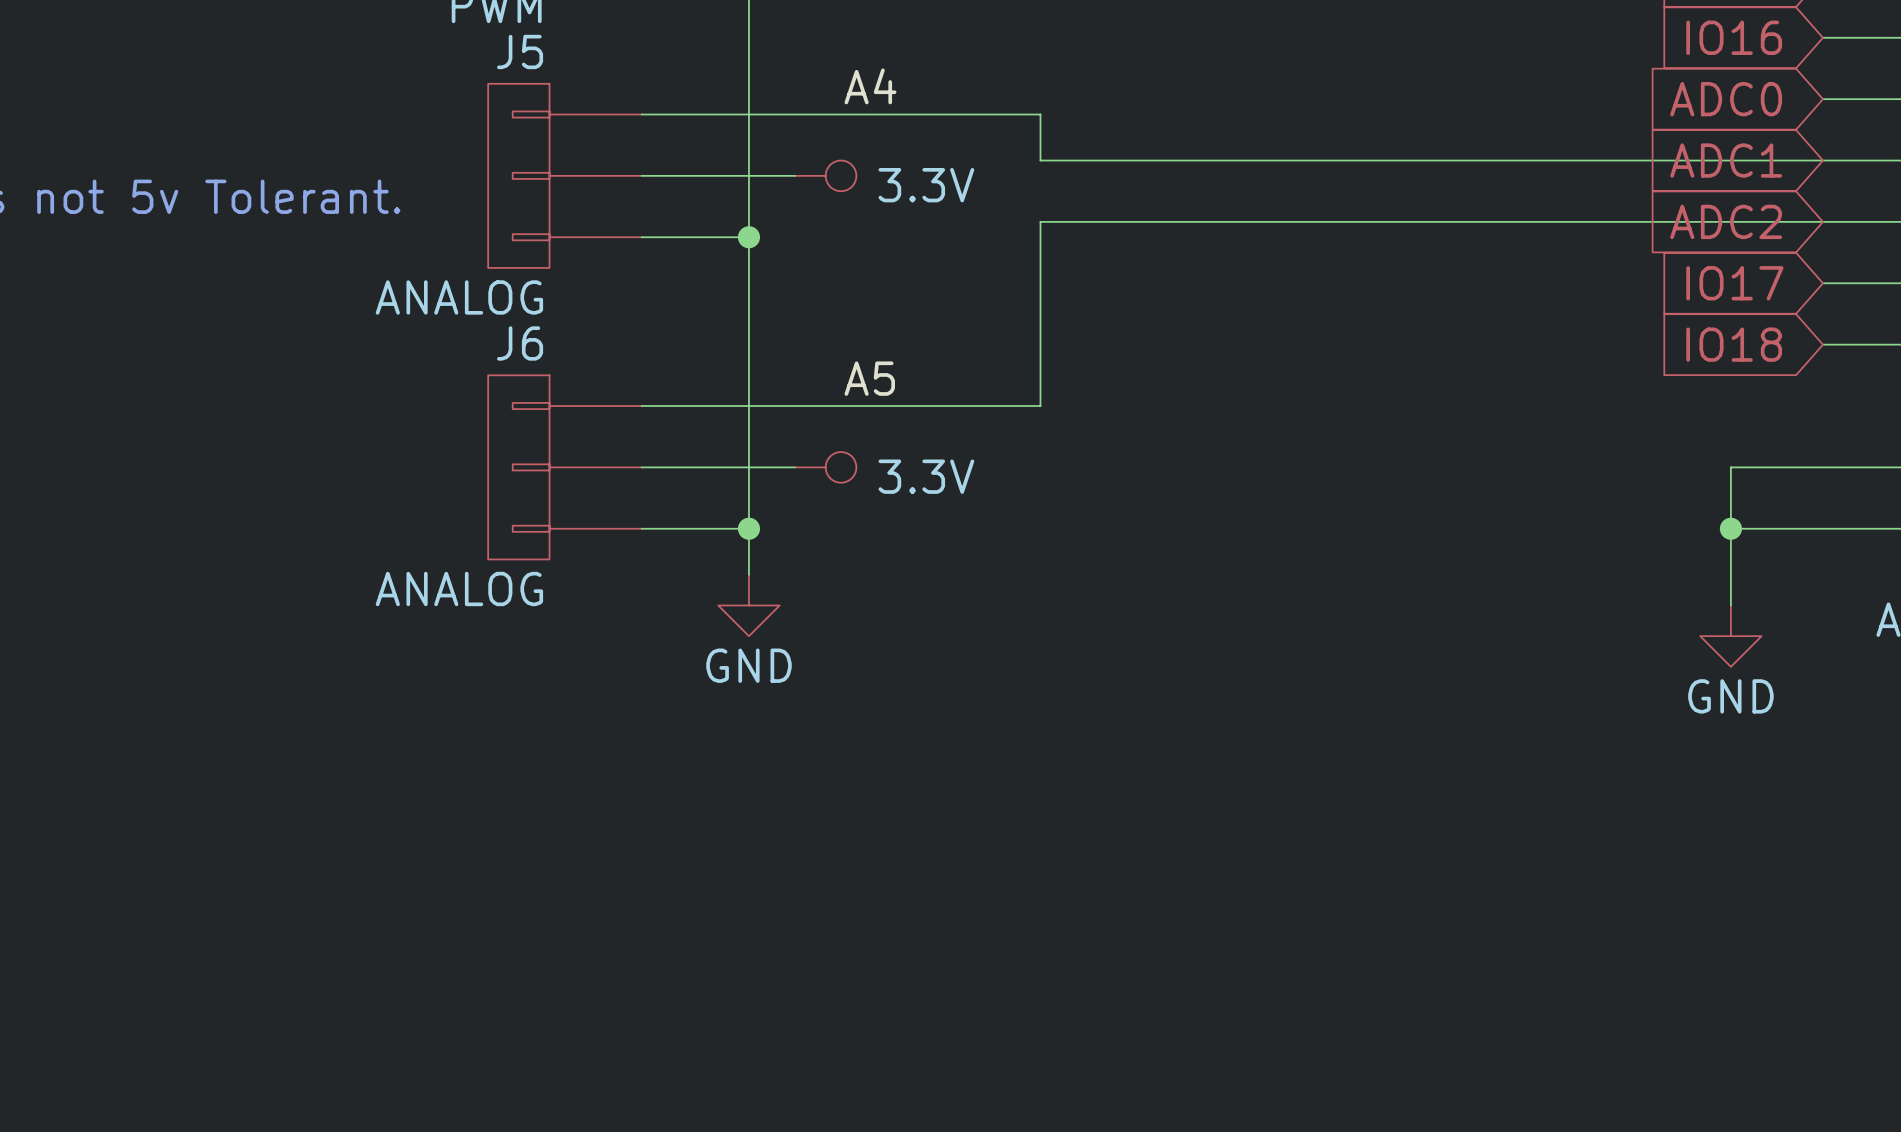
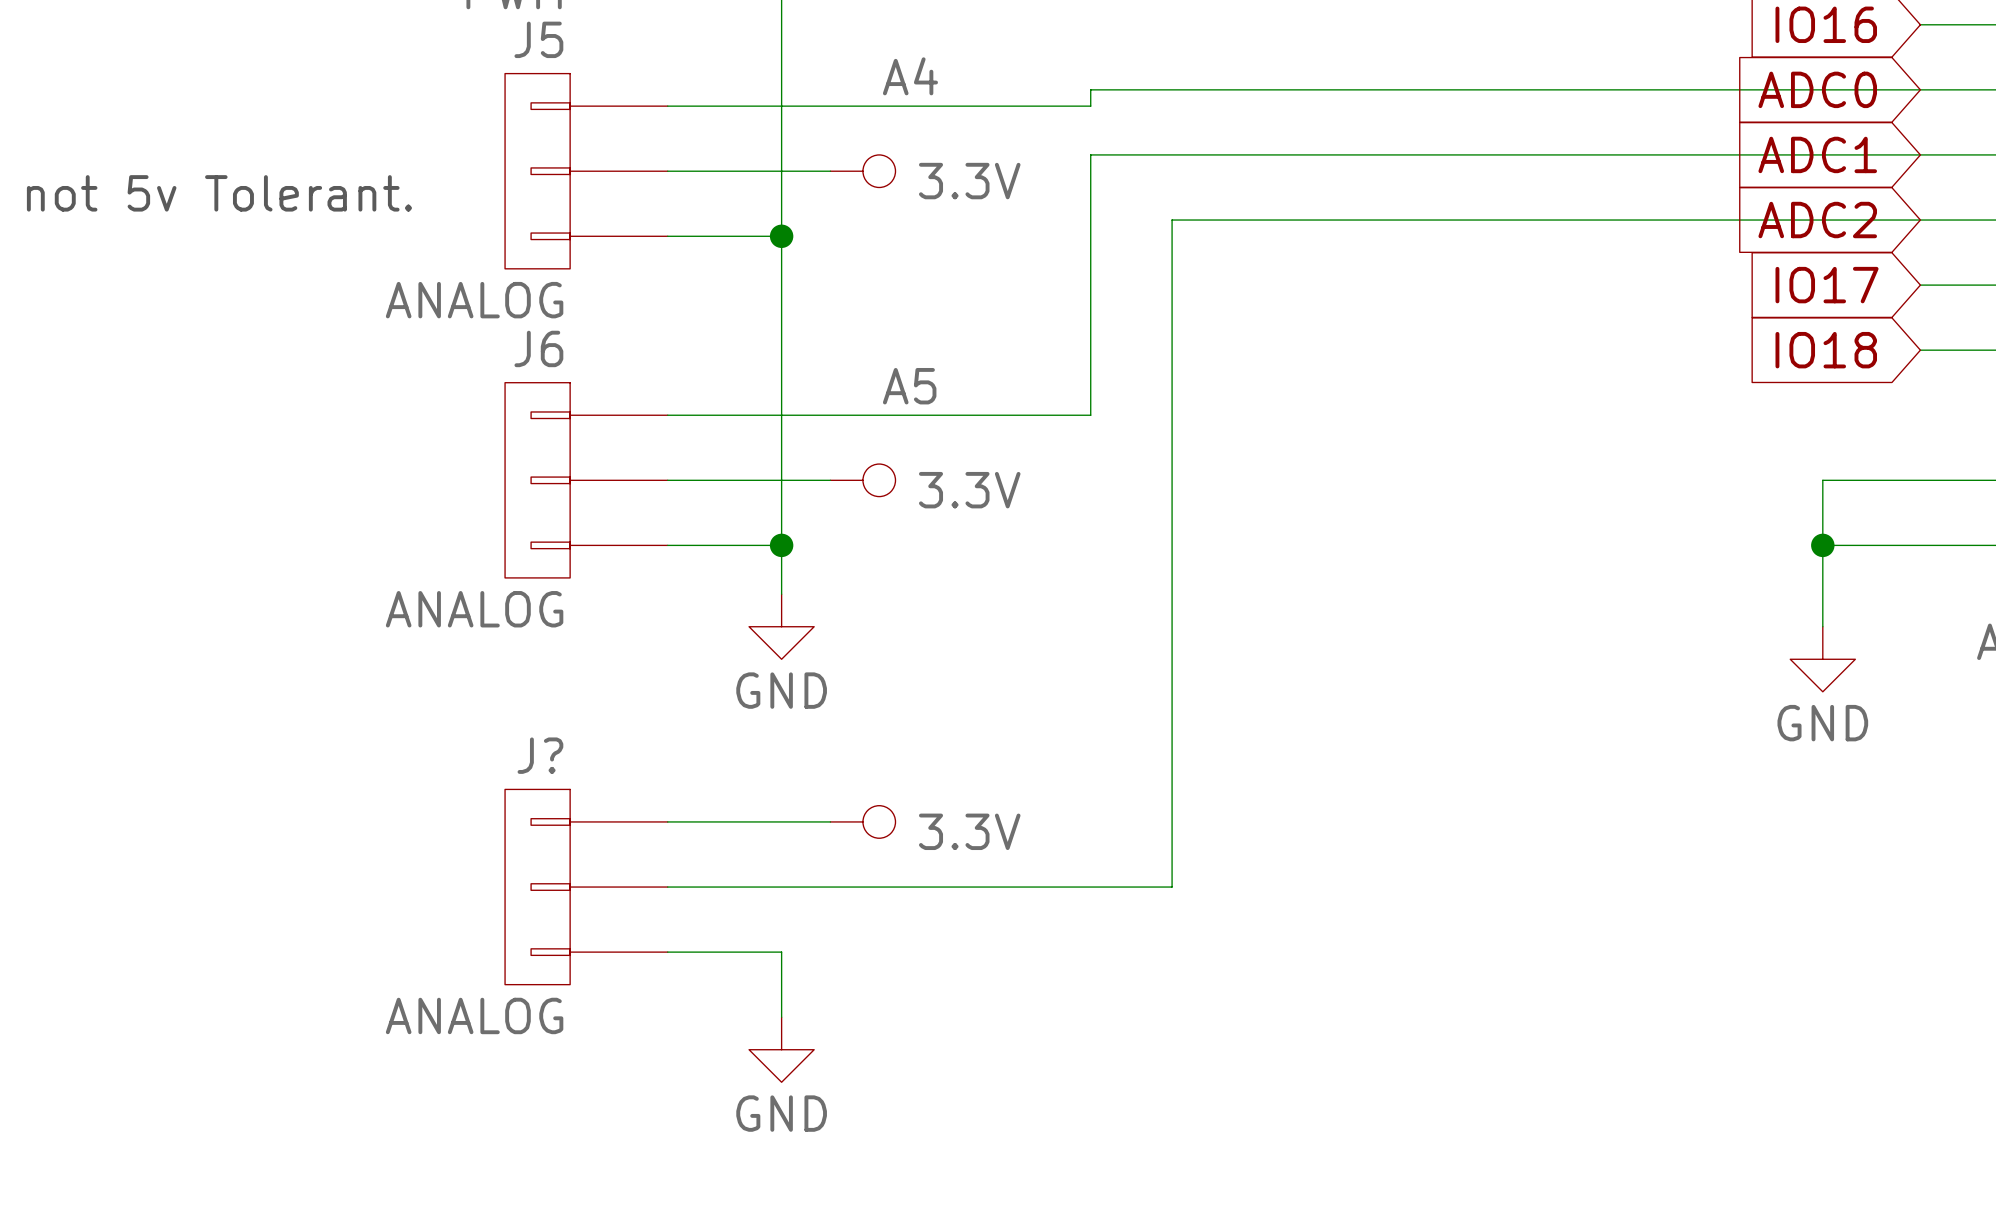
wire: (1040, 114) (1040, 160) -> (1090, 106) (1090, 89) (1920, 89)
wire: (1040, 221) (1117, 221) -> (1090, 220) (1090, 154)
wire: none -> (1172, 220) (1172, 887) (667, 887)
wire: none -> (667, 821) (830, 821)
power symbol: none -> 3.3V (862, 821)
J?: none -> ANALOG (586, 887)
wire: none -> (667, 952) (781, 952) (781, 1017)
power symbol: none -> GND (781, 1049)

